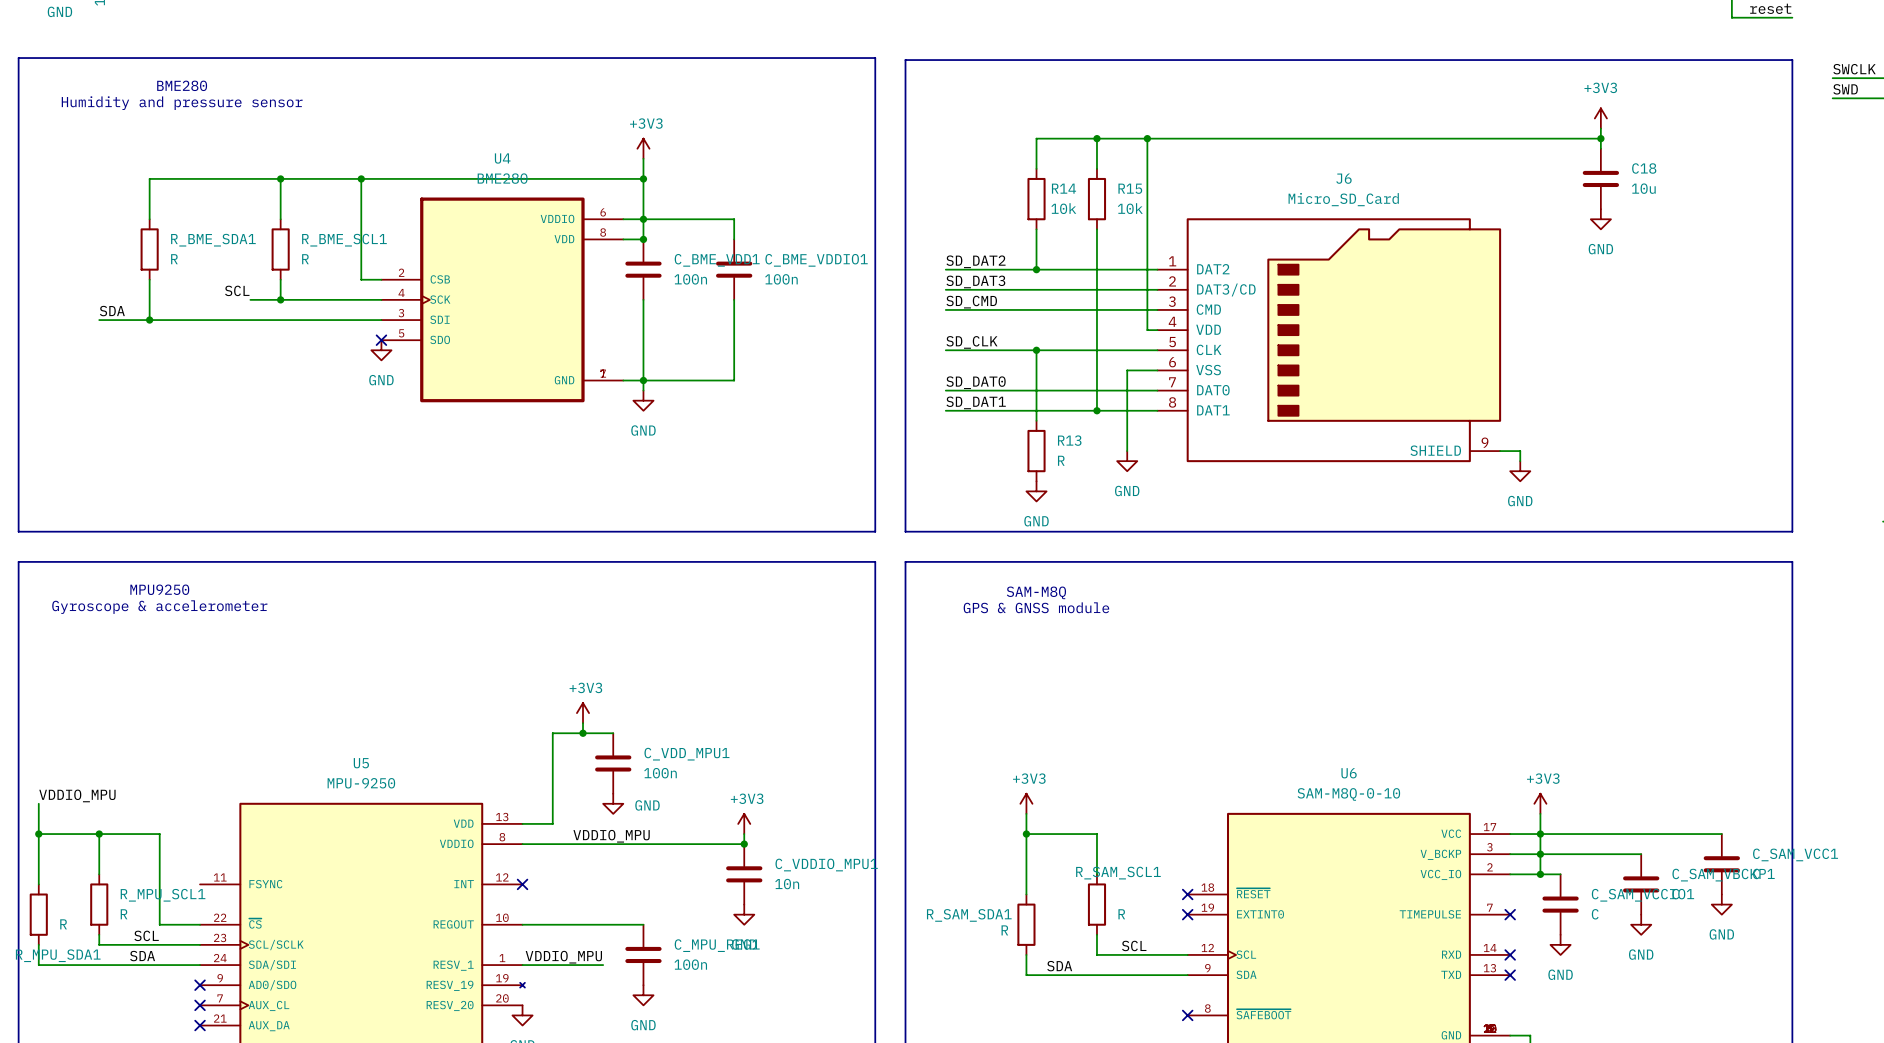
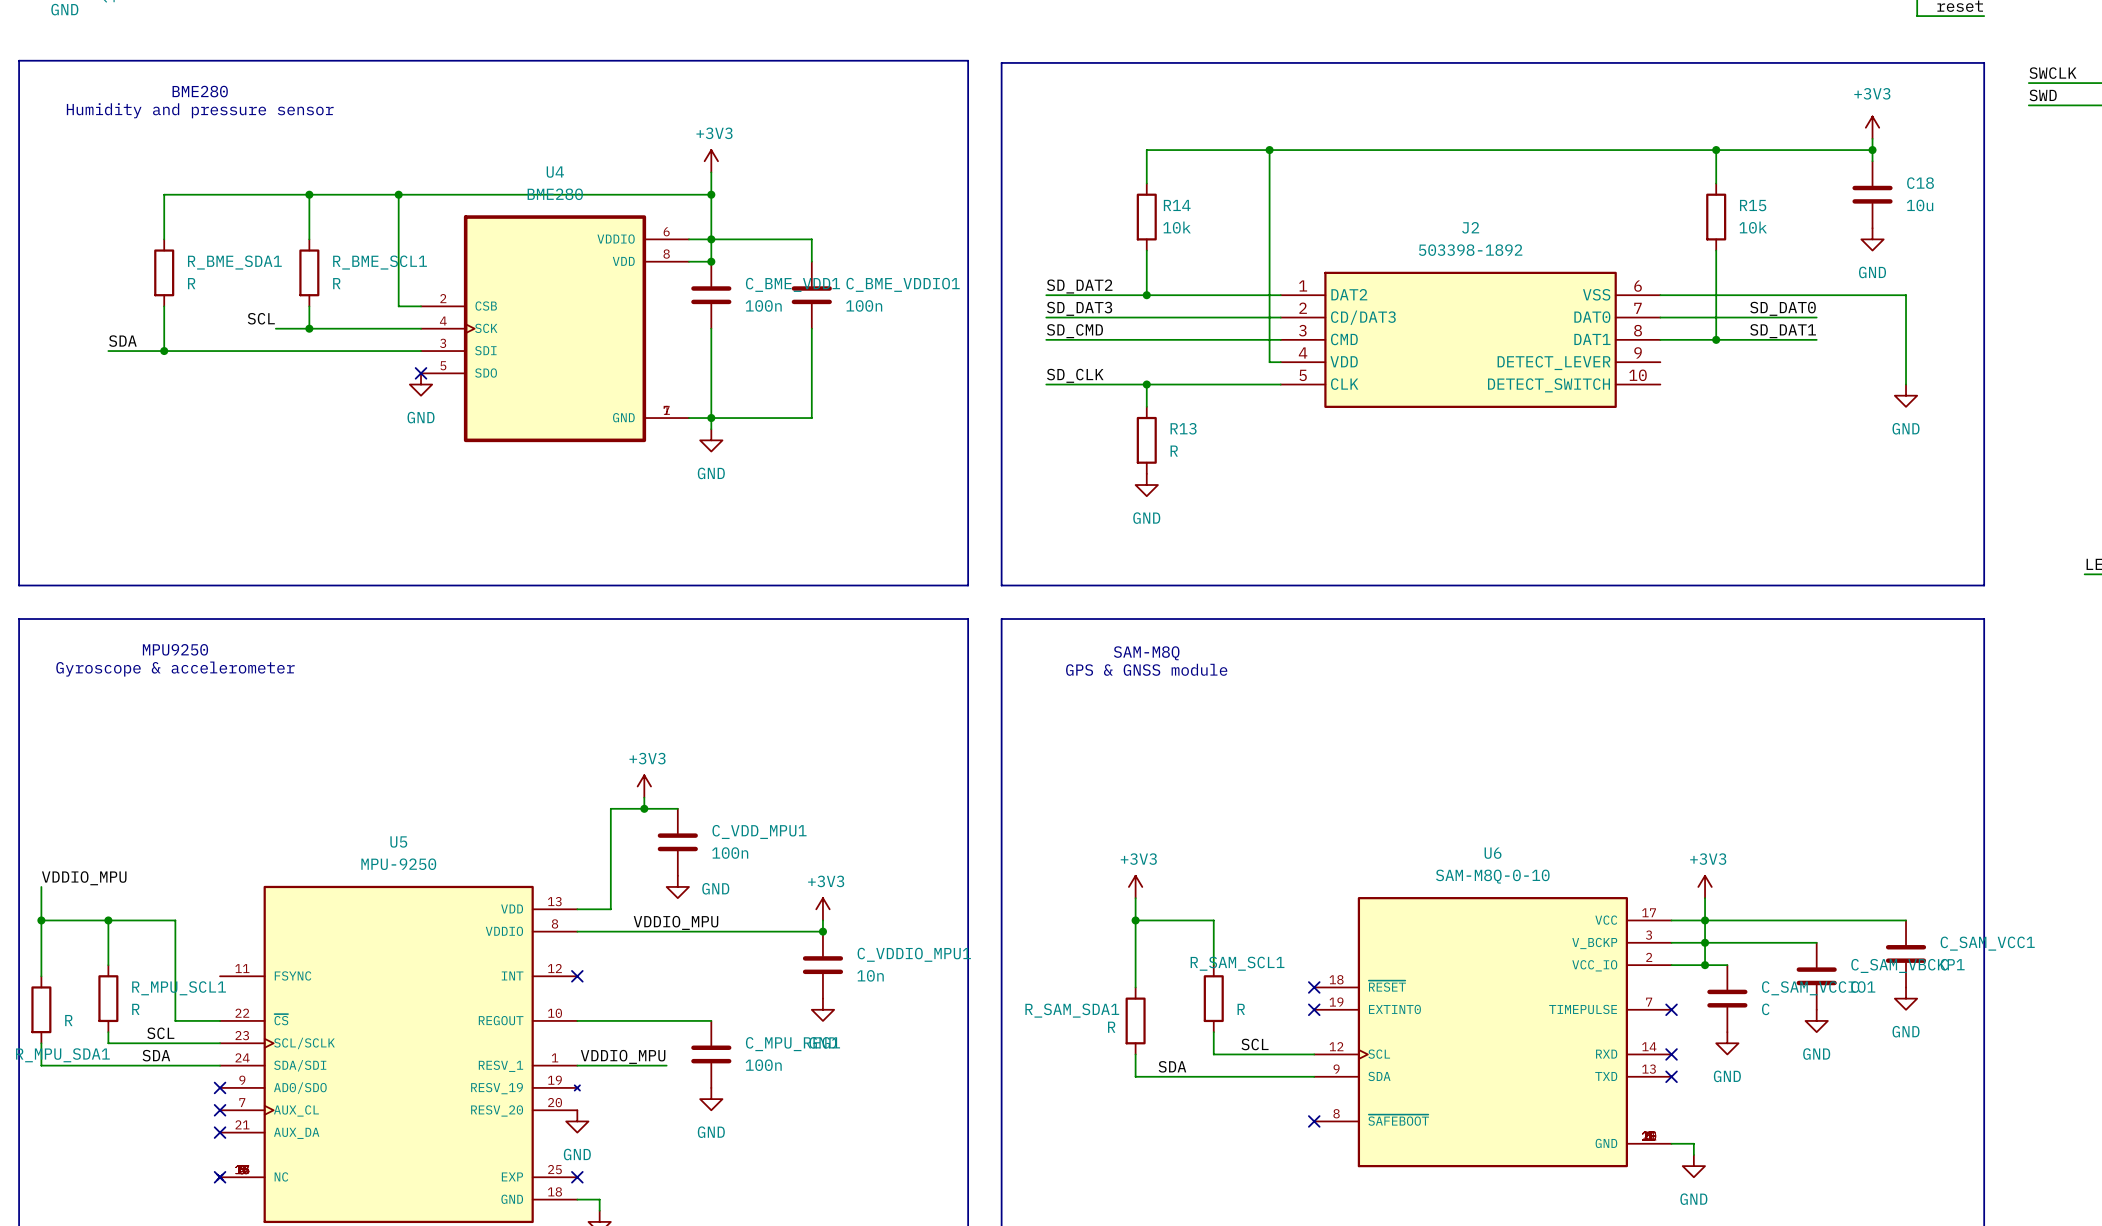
power symbol position: +3V3 (1600, 118) -> +3V3 (1872, 127)
wire: (1600, 128) (1600, 148) -> (1872, 138) (1872, 161)
wire: (1096, 138) (1096, 168) -> none
junction: (1096, 138) -> none
wire: none -> (1716, 150) (1716, 183)
junction: none -> (1716, 150)
wire: none -> (1772, 150) (1872, 150)
junction: (1600, 138) -> none
junction: none -> (1872, 150)
C18 position: (1600, 178) -> (1872, 194)
R15 position: (1096, 199) -> (1716, 217)
power symbol position: GND (1600, 219) -> GND (1872, 239)
wire: (1096, 229) (1096, 410) -> none
wire: none -> (1716, 250) (1716, 339)
wire: none -> (1660, 295) (1906, 295) (1906, 384)
label: none -> SD_DAT0 (1783, 308)
wire: none -> (1660, 317) (1816, 317)
label: none -> SD_DAT1 (1783, 331)
J2: none -> 503398-1892 (1470, 339)
wire: none -> (1660, 339) (1816, 339)
junction: none -> (1716, 339)
J6: Micro_SD_Card (1329, 340) -> none
power symbol: none -> GND (1906, 395)
wire: (1036, 370) (1036, 420) -> none
wire: (1157, 370) (1127, 370) (1127, 451) -> none
label: SD_DAT0 (976, 382) -> none
wire: (945, 390) (1157, 390) -> none
label: SD_DAT1 (976, 402) -> none
wire: (945, 410) (1157, 410) -> none
junction: (1096, 410) -> none
power symbol: none -> GND (1146, 485)
R13 position: (1036, 451) -> (1146, 440)
wire: (1500, 451) (1520, 451) (1520, 461) -> none
power symbol: GND (1127, 461) -> none
power symbol: GND (1520, 471) -> none
power symbol: GND (1036, 491) -> none

